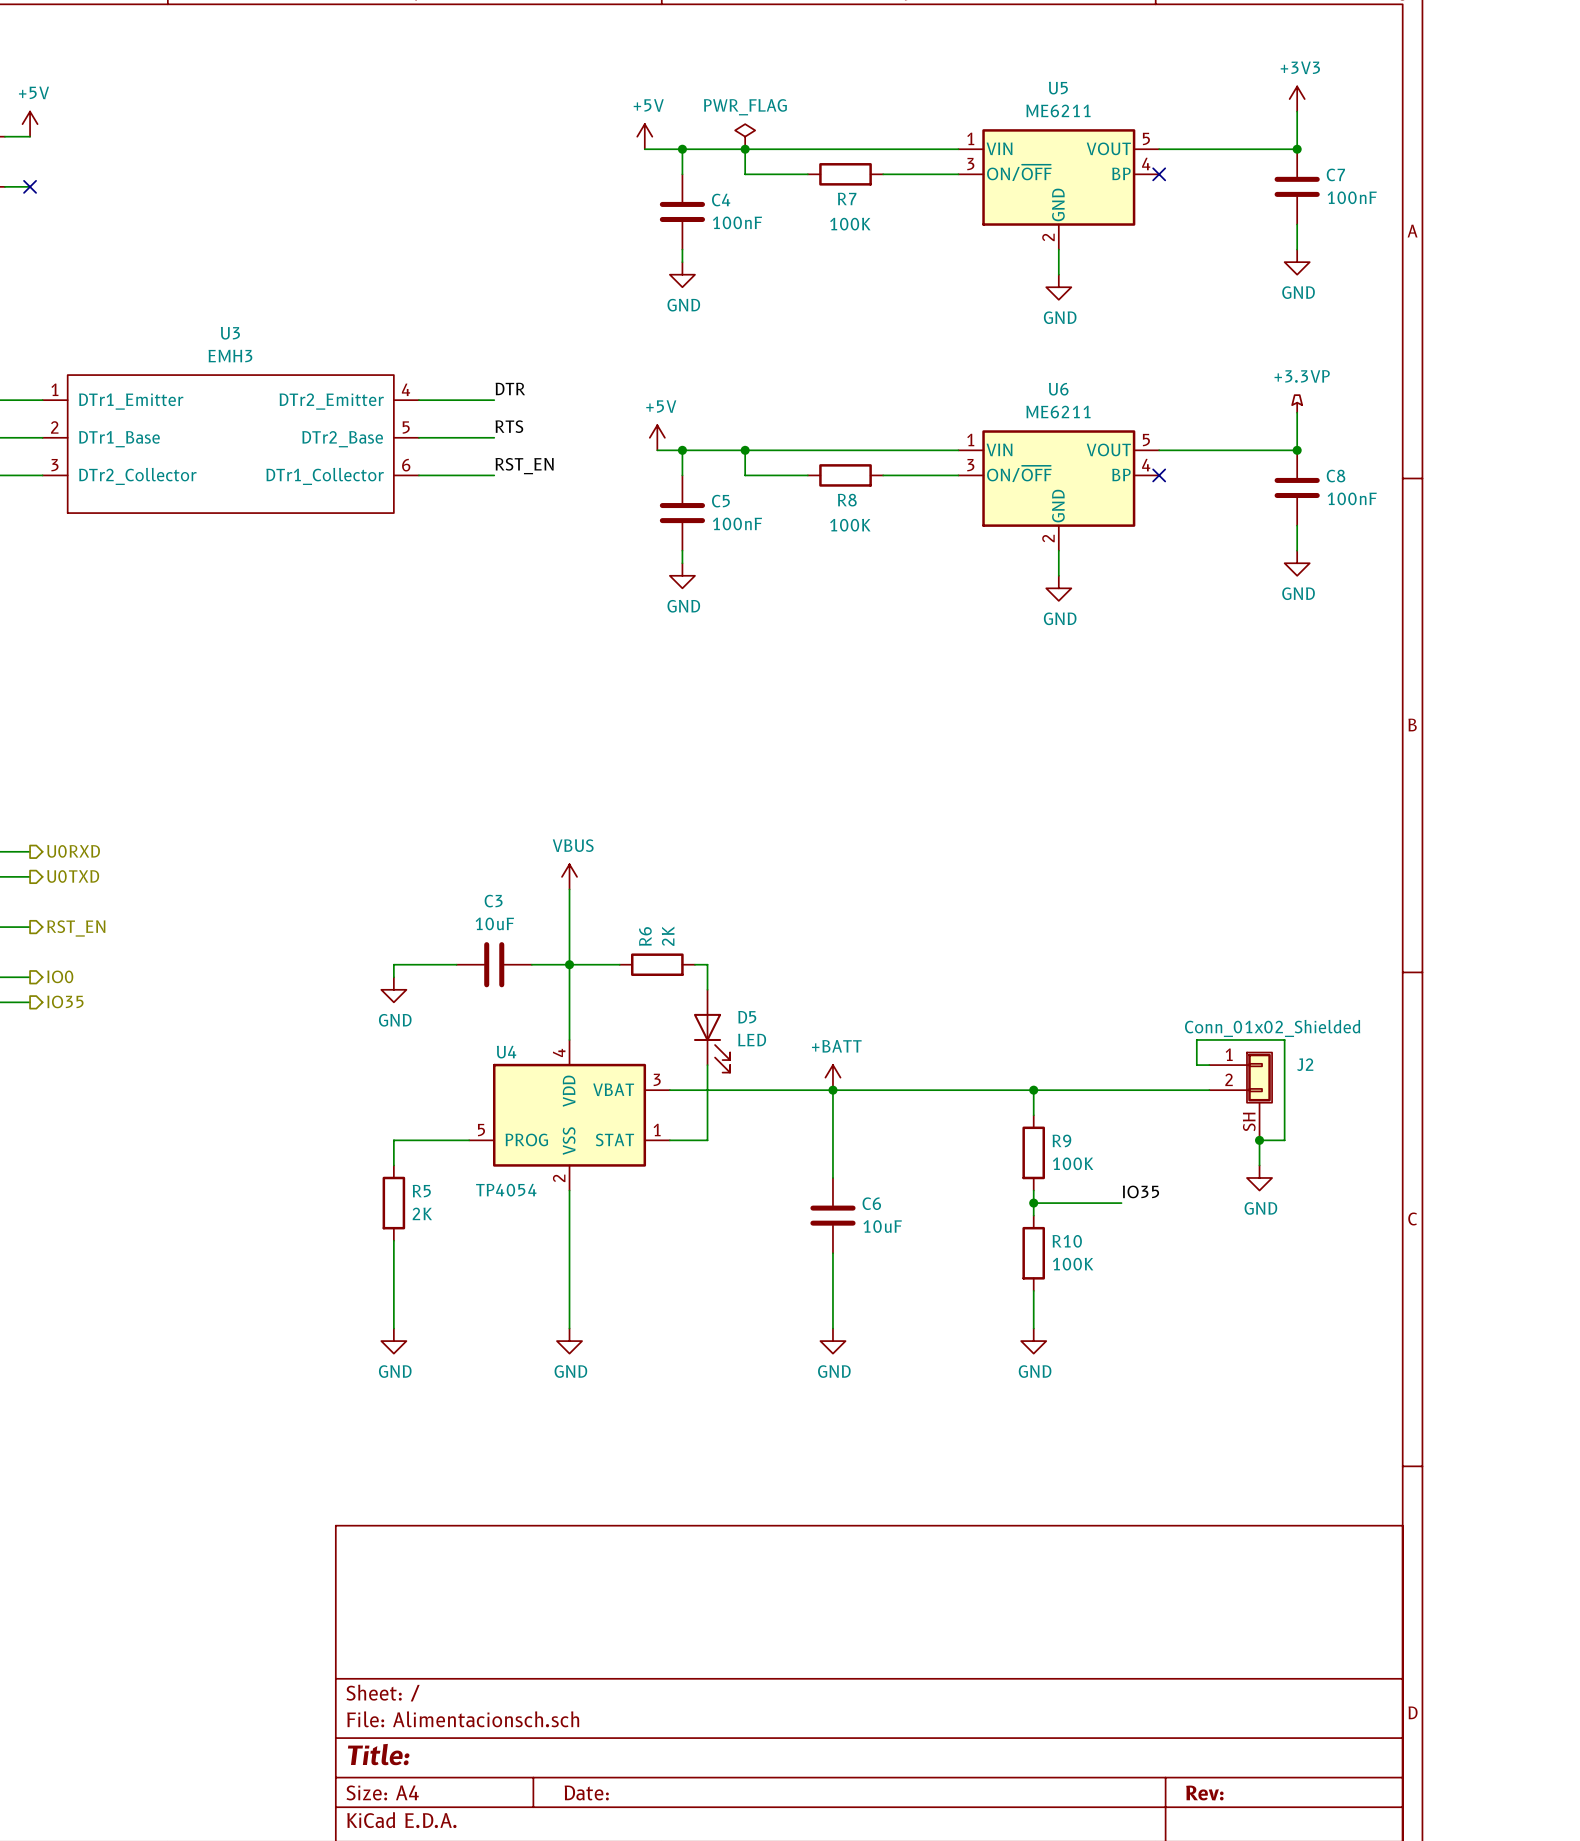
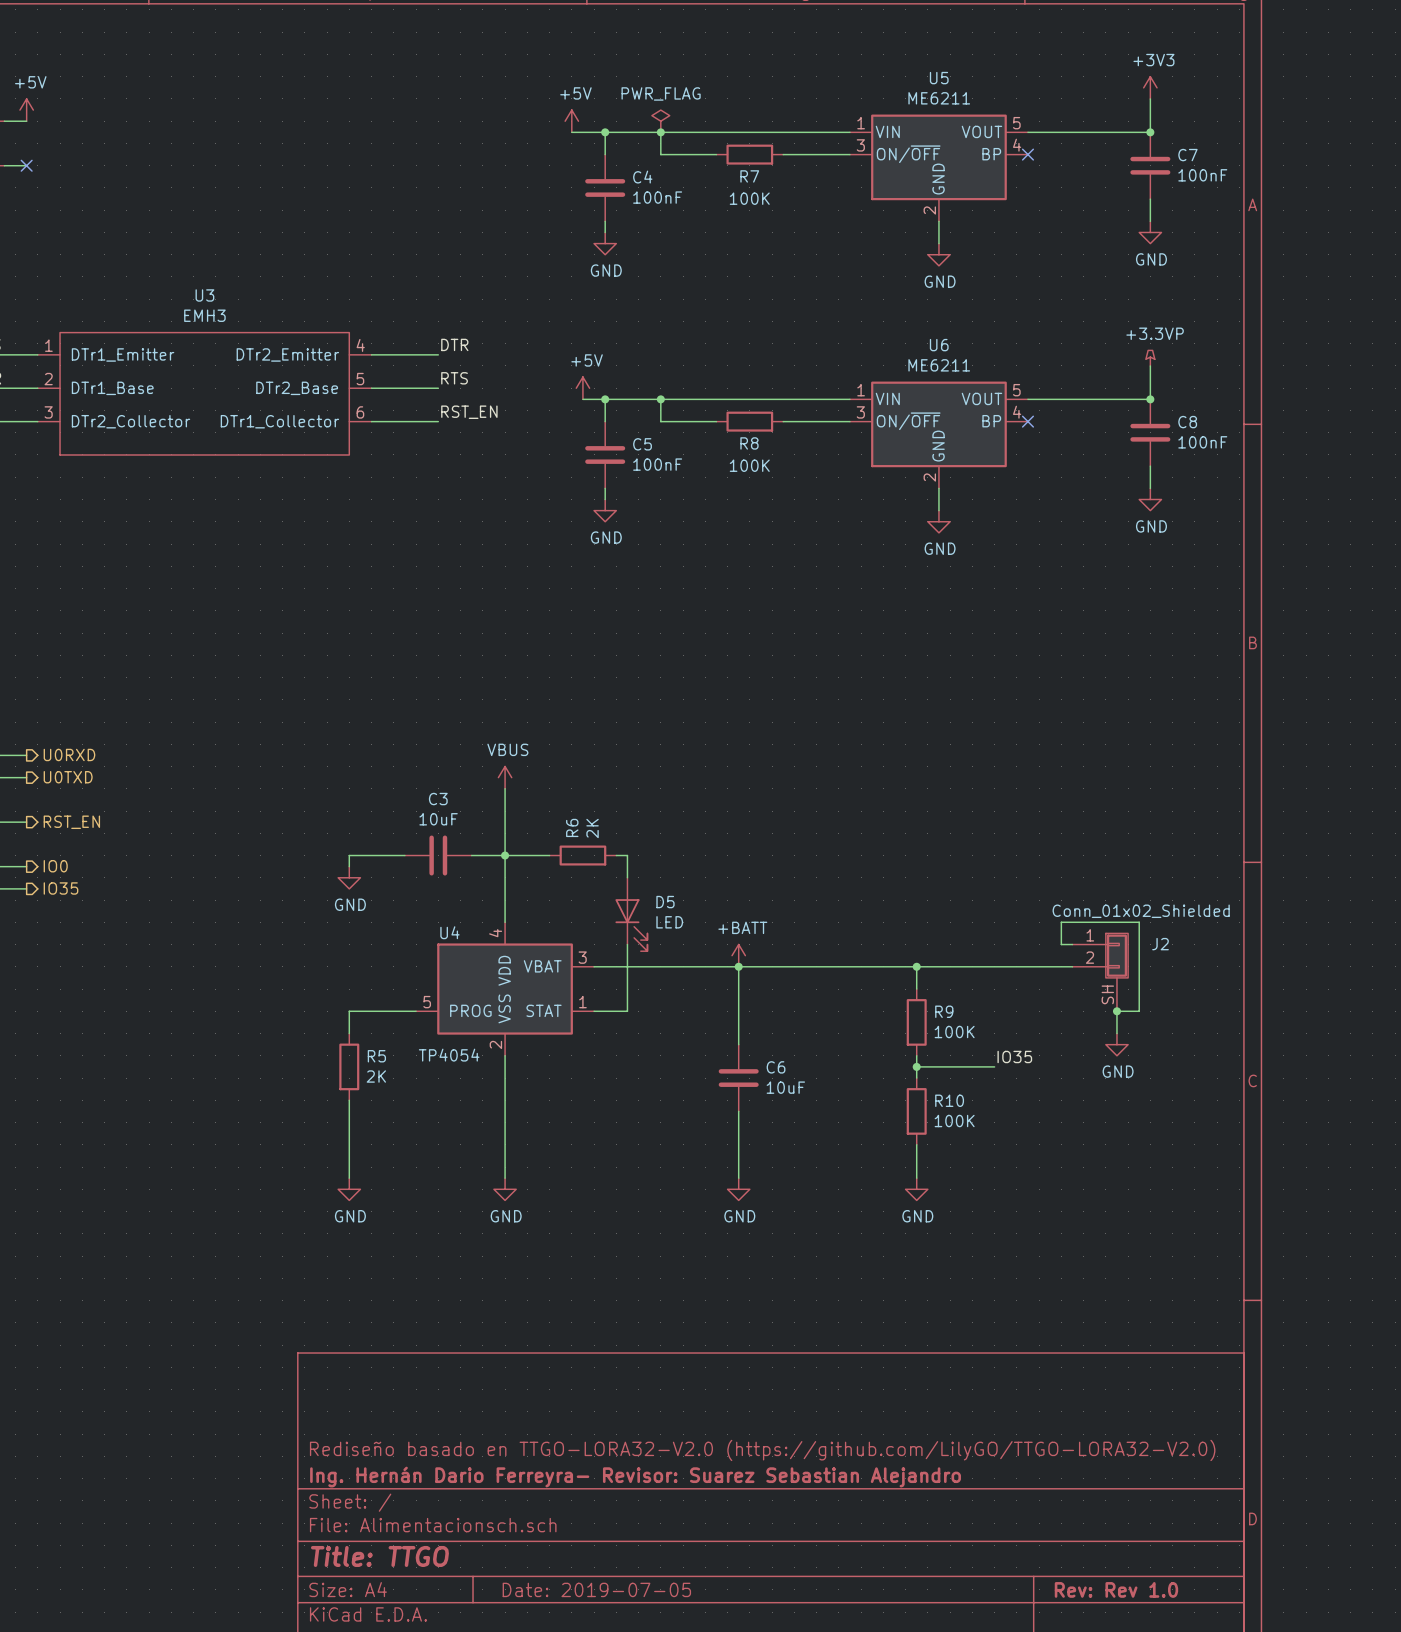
title block: none -> Rediseño basado en TTGO-LORA32-V2.0 (https://github.com/LilyGO/TTGO-LORA32-V2.0) (762, 1450)
title block: none -> Ing. Hernán Dario Ferreyra- Revisor: Suarez Sebastian Alejandro (635, 1477)
title block: Title: (378, 1754) -> Title: TTGO (379, 1556)
title block: Date: (586, 1792) -> Date: 2019-07-05 (596, 1589)
title block: Rev: (1204, 1793) -> Rev: Rev 1.0 (1116, 1589)

